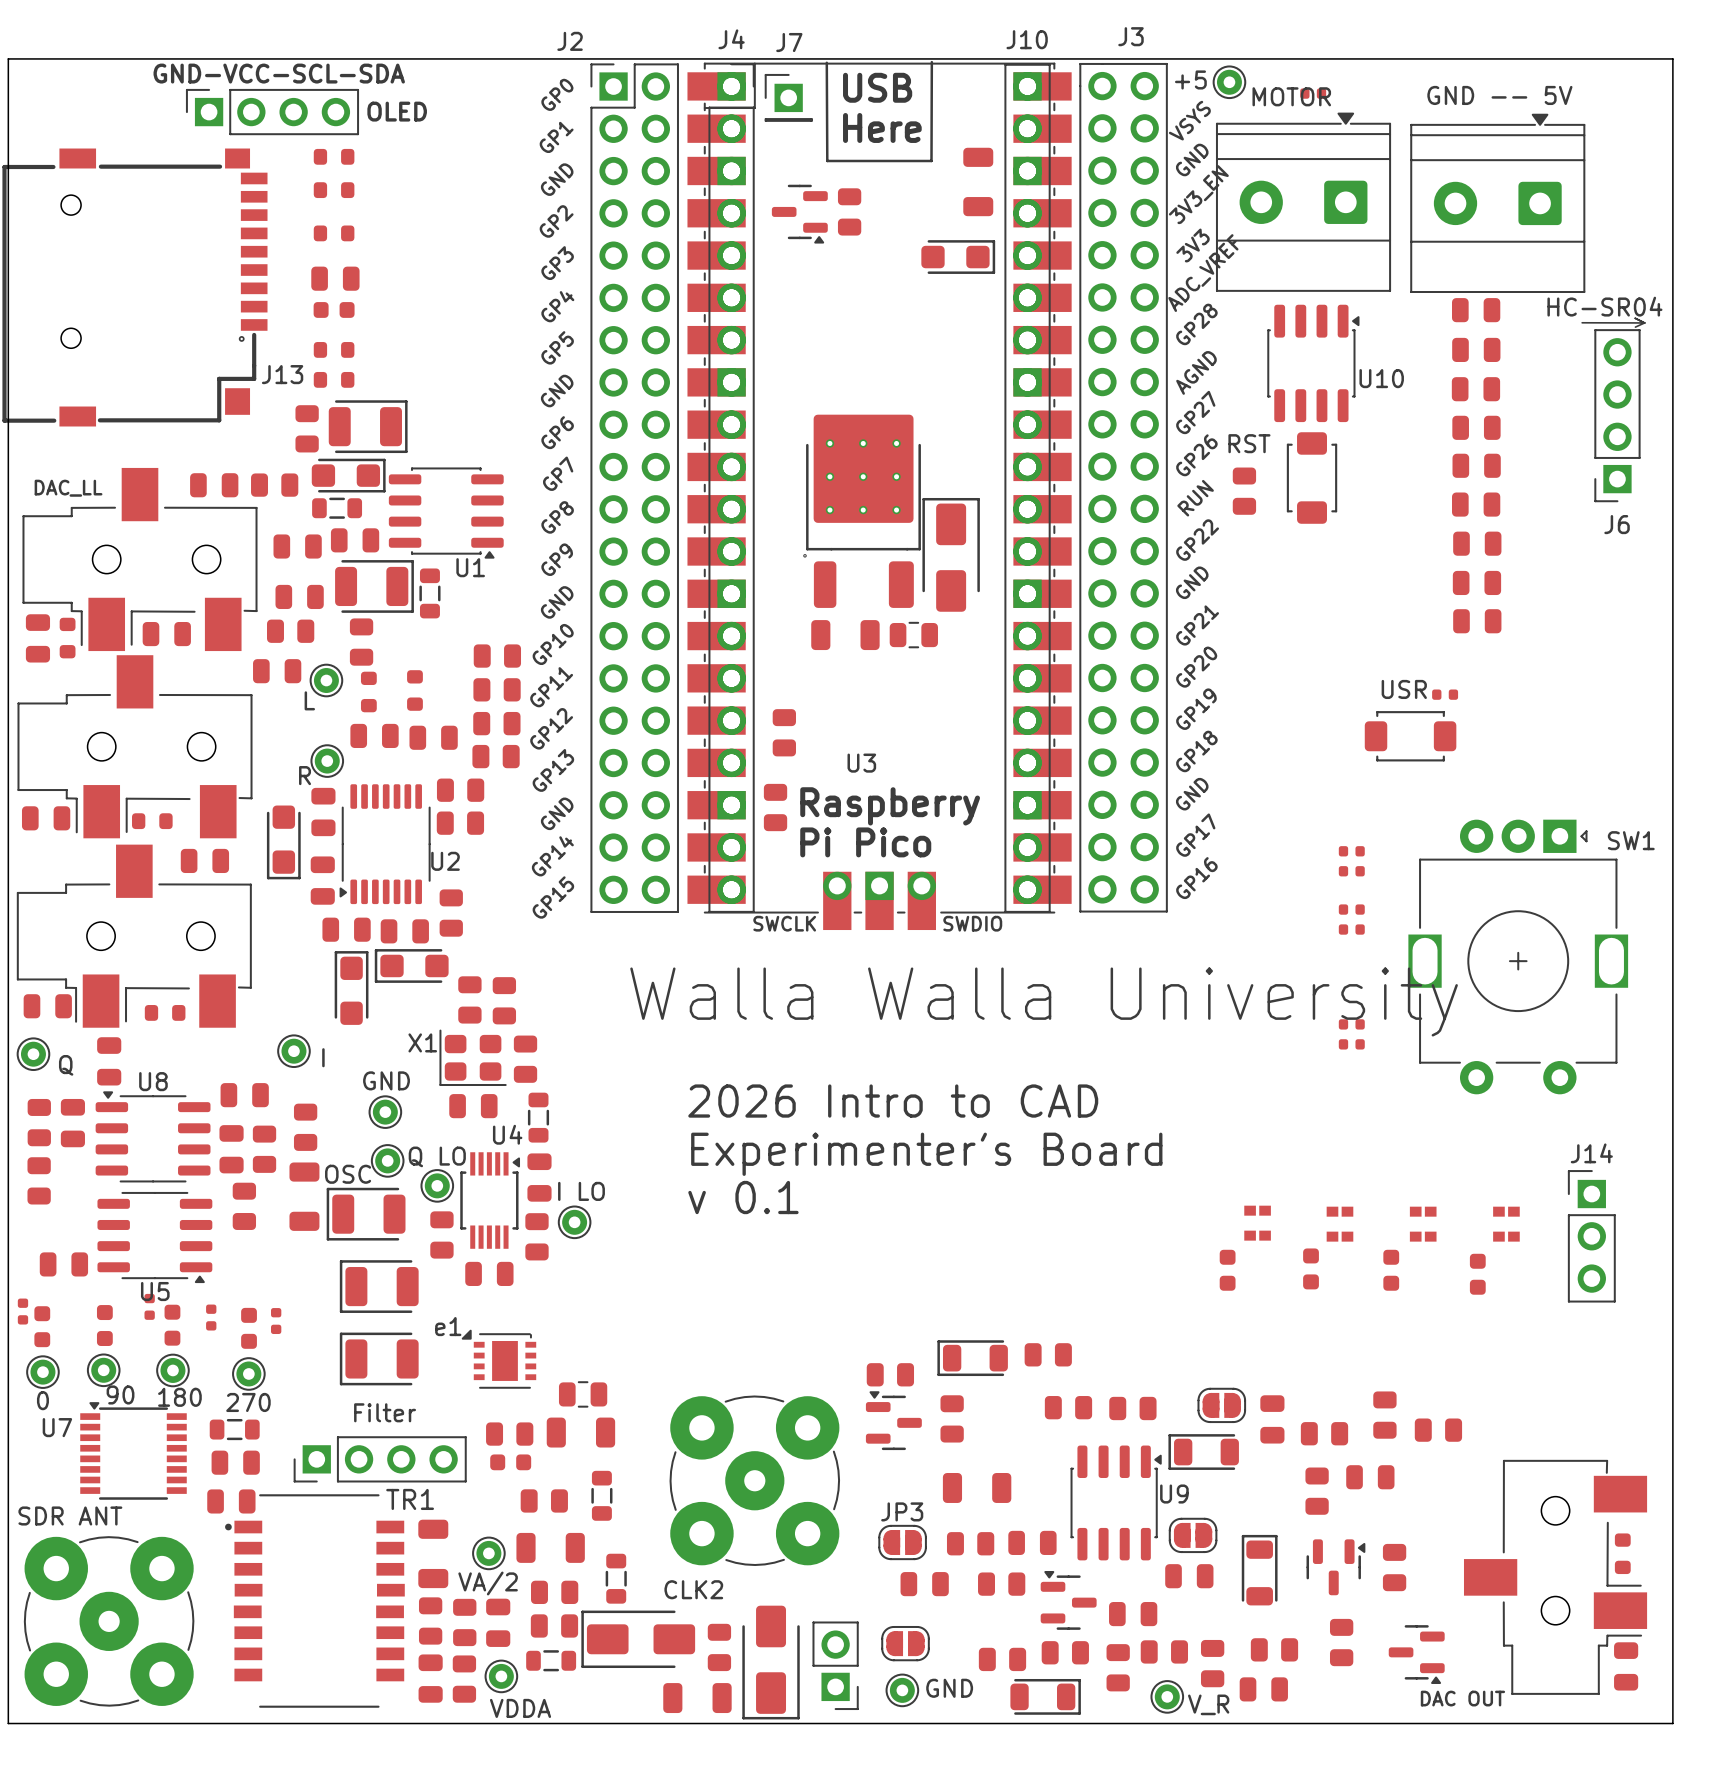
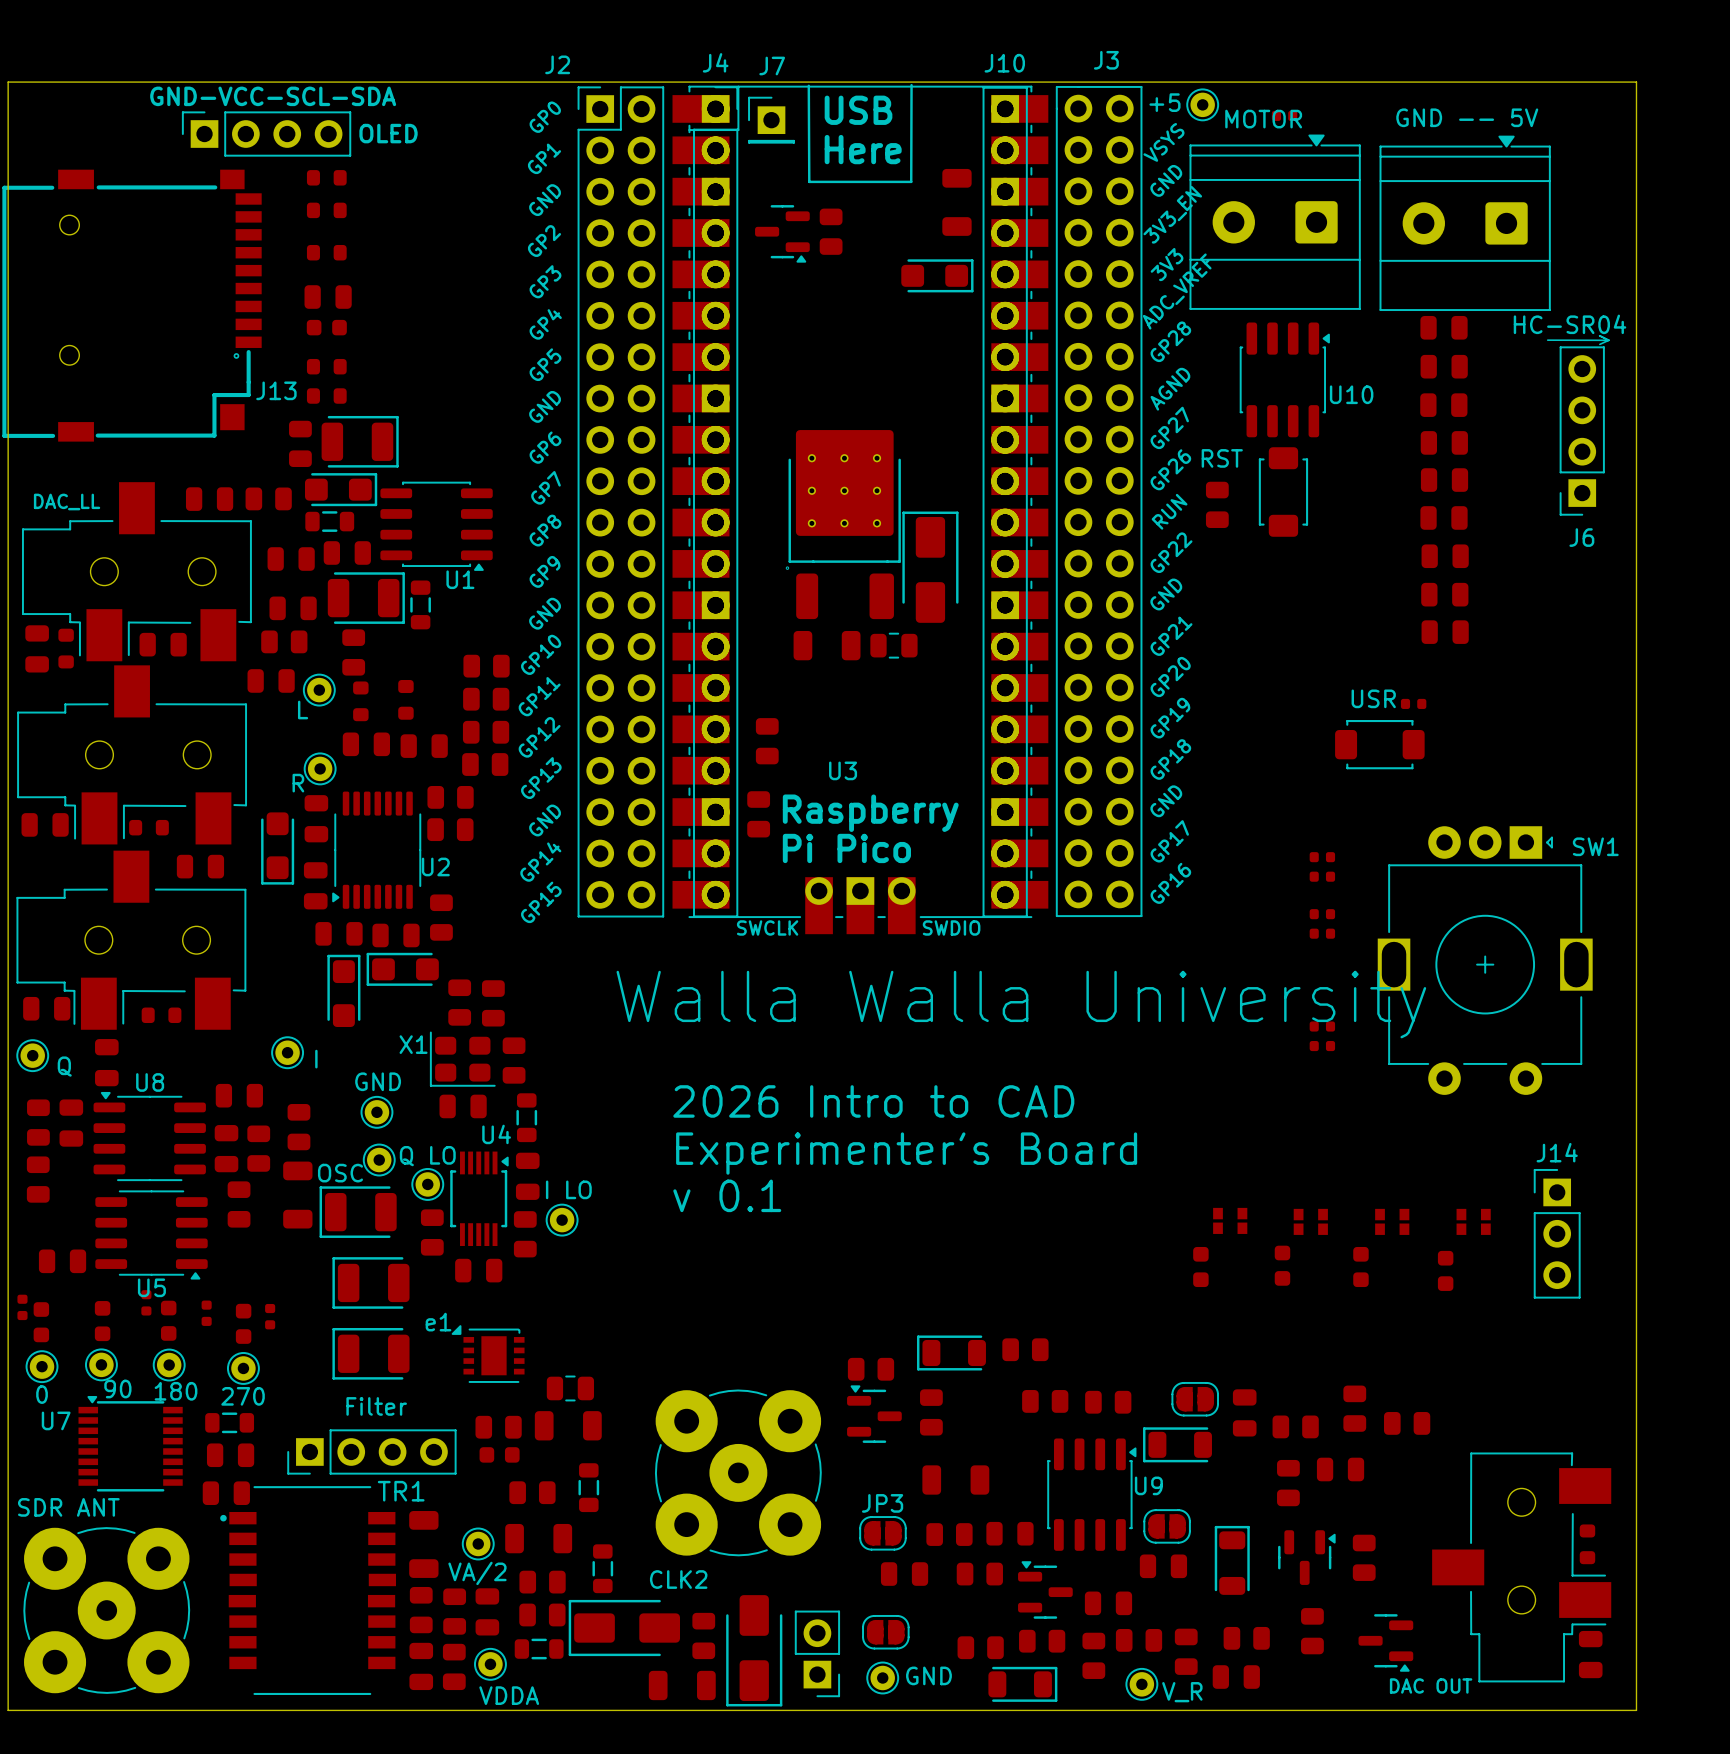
part rotation: 0° (1257, 1223) -> 90° clockwise (1230, 1220)
part rotation: 0° (1339, 1224) -> 90° clockwise (1310, 1221)
part rotation: 0° (1423, 1224) -> 90° clockwise (1392, 1221)
part rotation: 0° (1506, 1224) -> 90° clockwise (1473, 1221)

